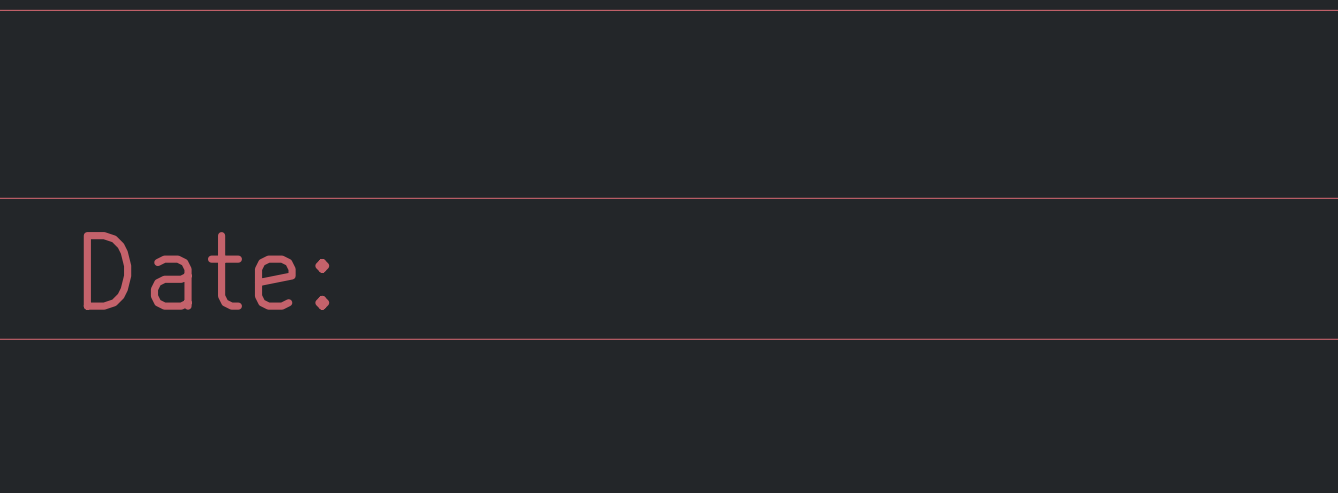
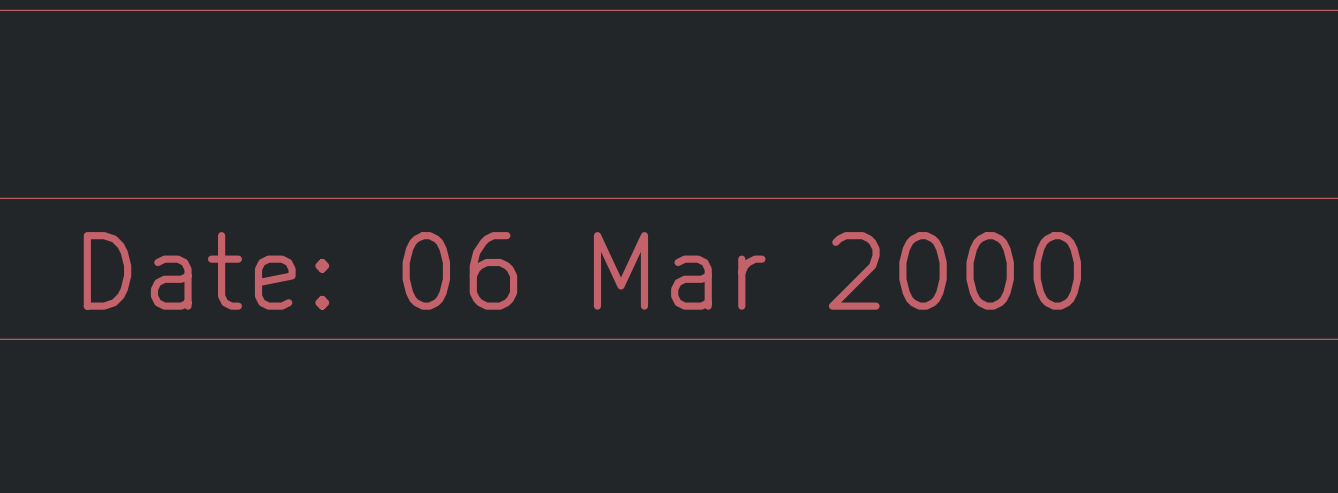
title block: Date: (206, 270) -> Date: 06 Mar 2000 (582, 270)

